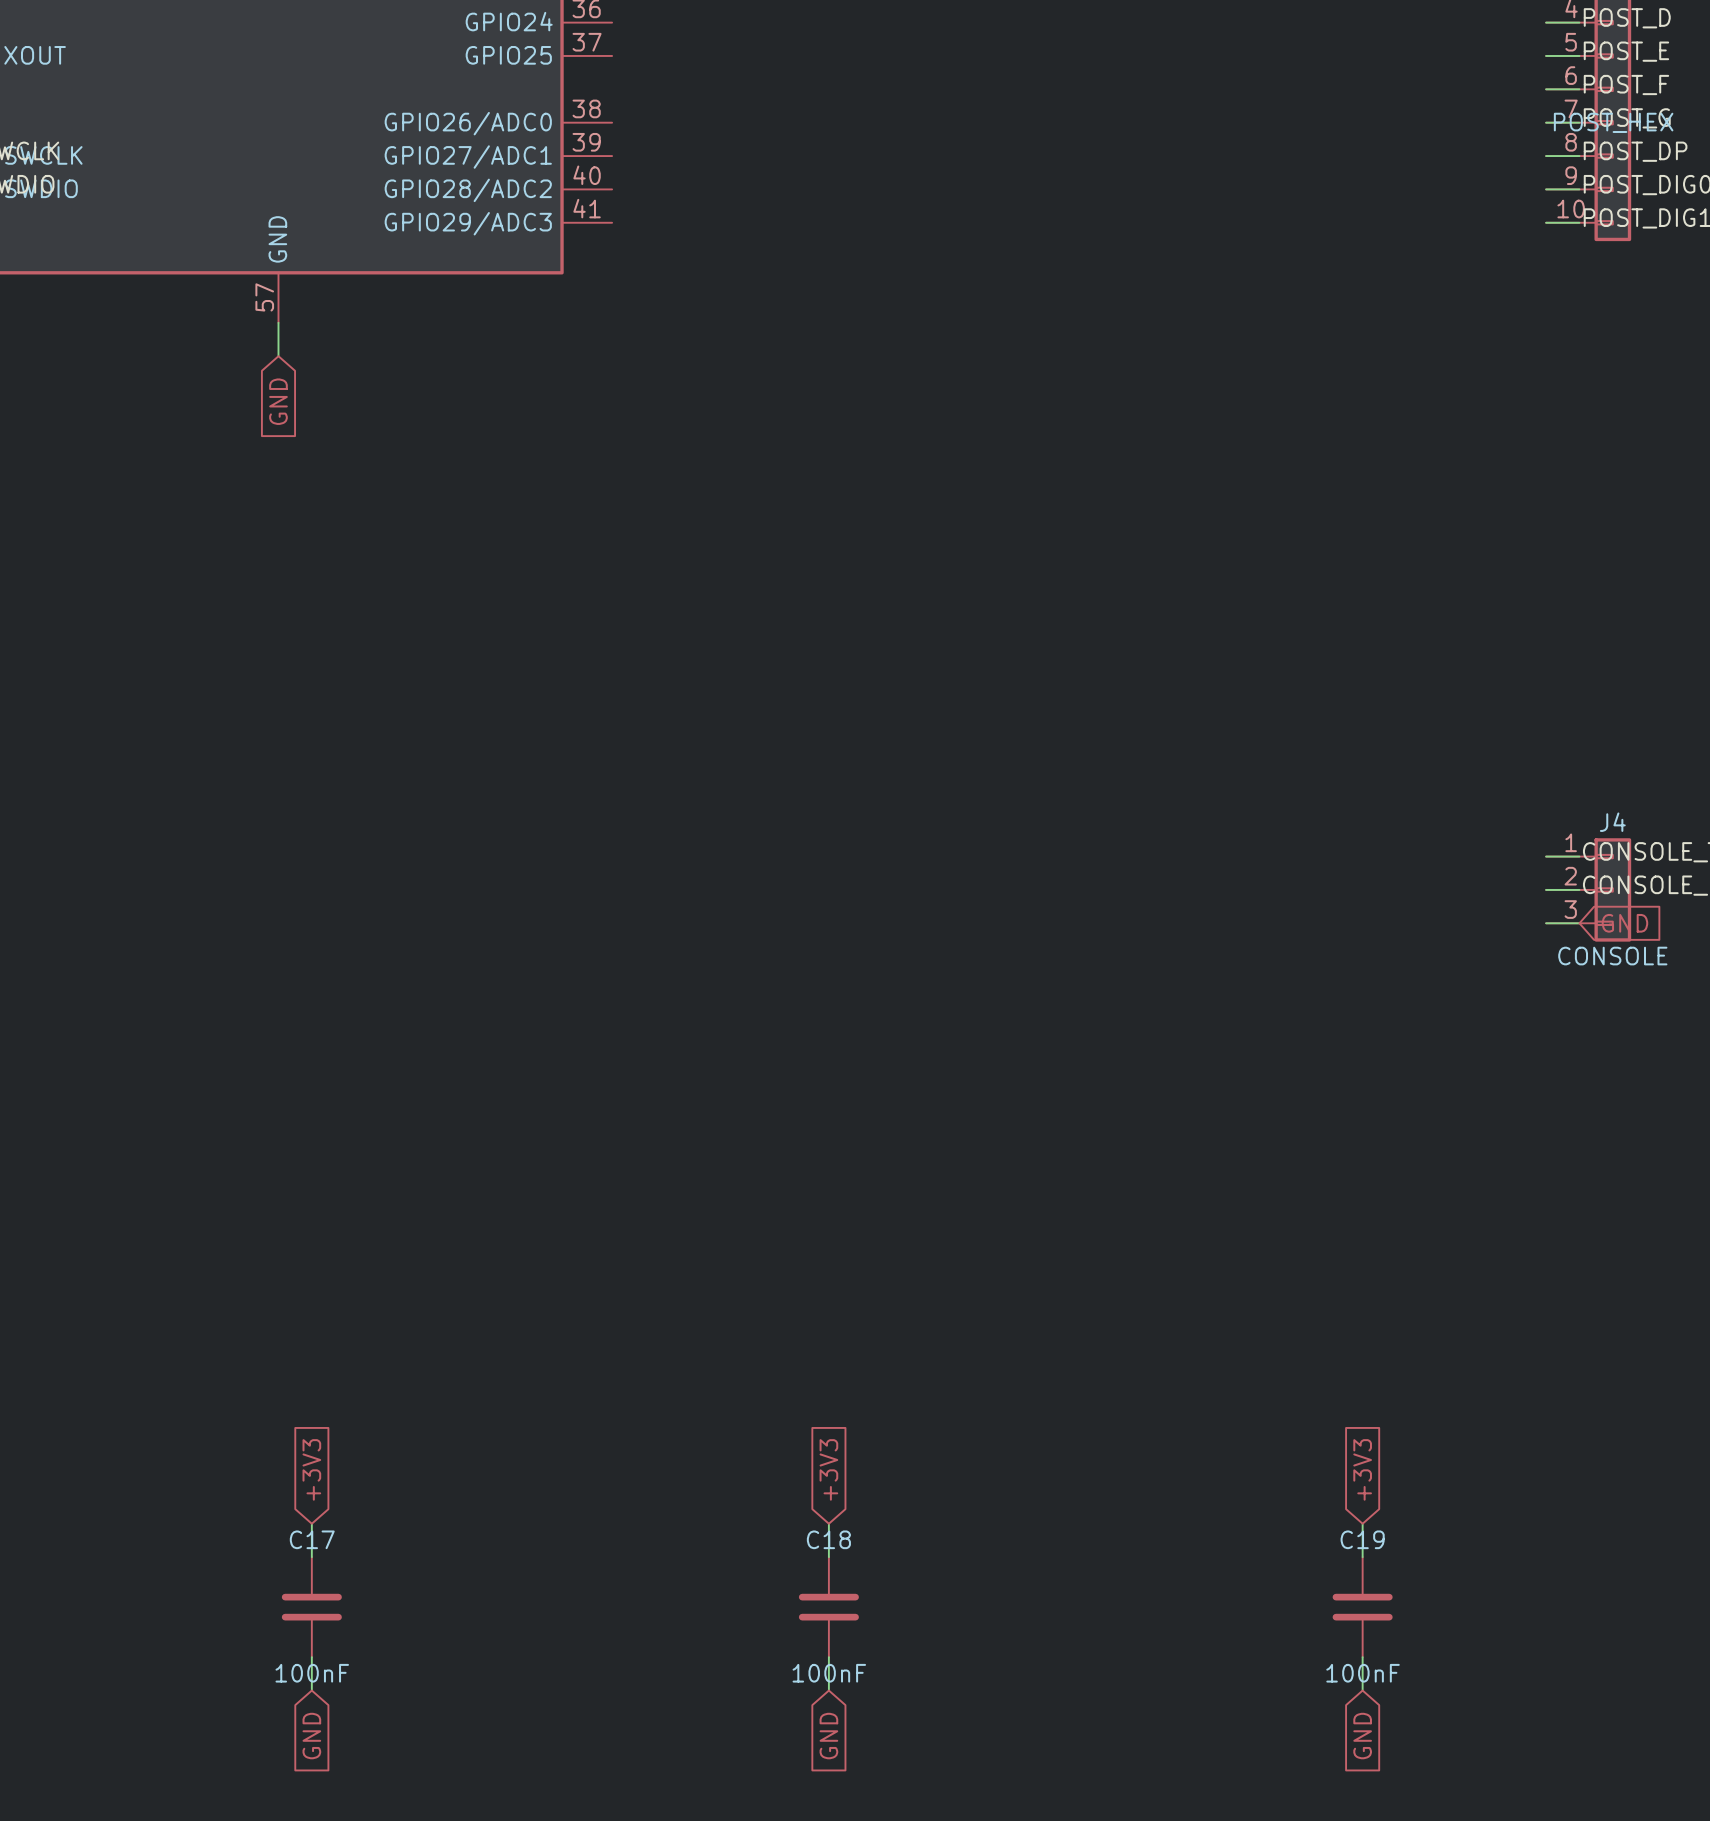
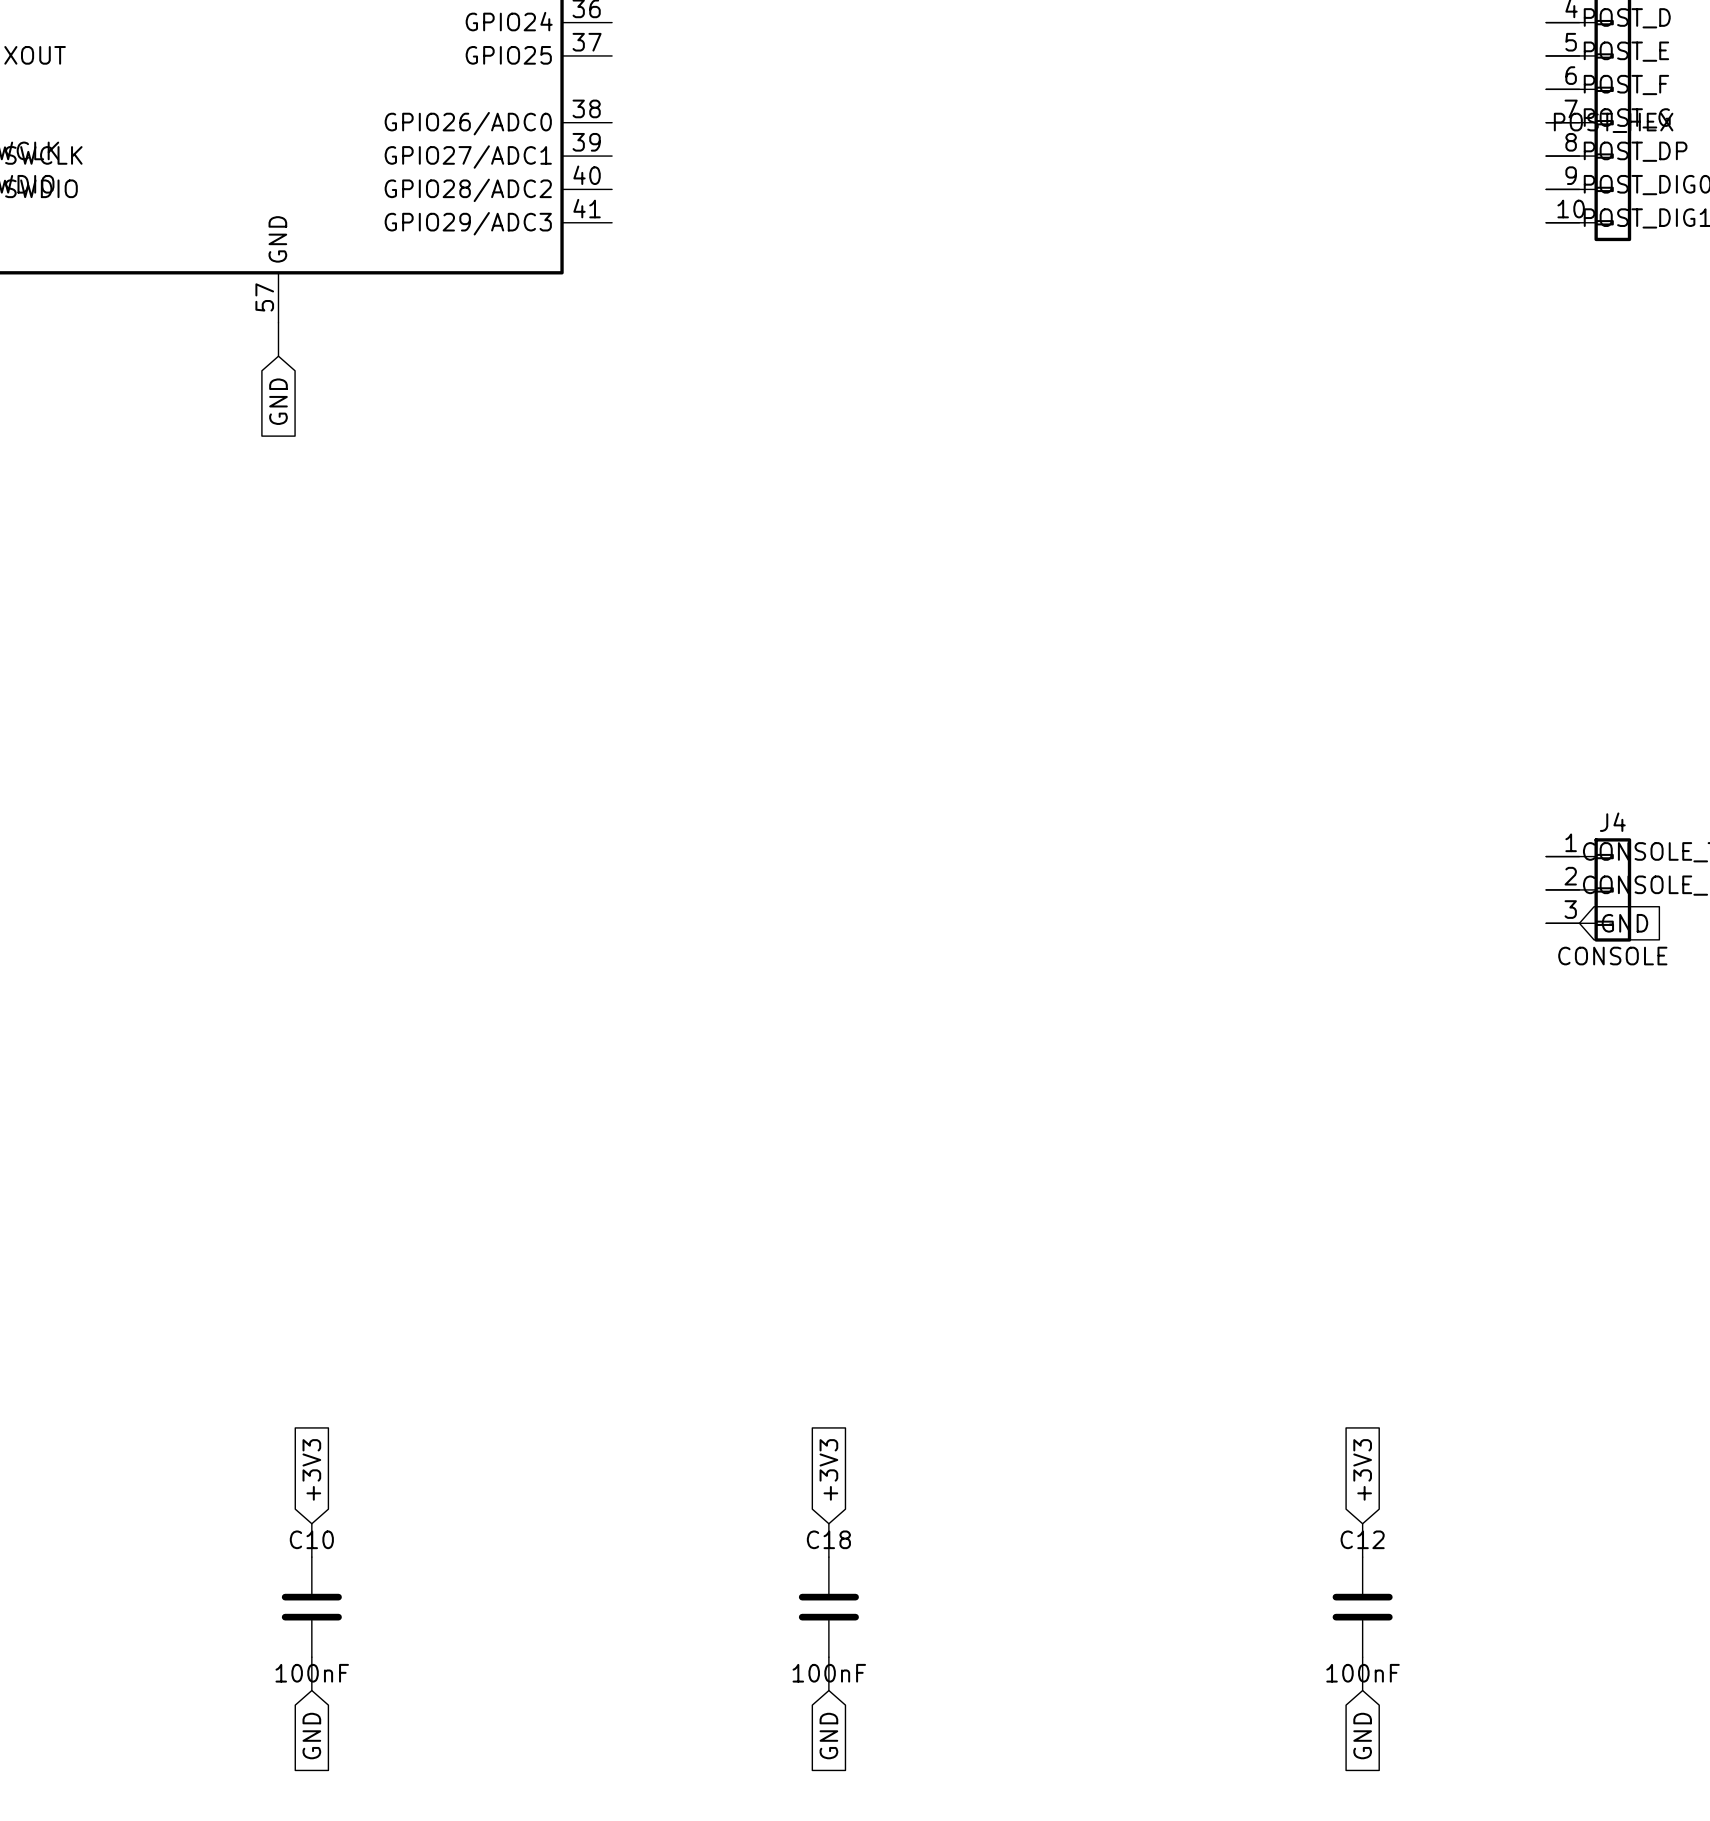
C17 name: C17 (312, 1539) -> C10 (311, 1539)
C19 name: C19 (1362, 1539) -> C12 (1362, 1539)

